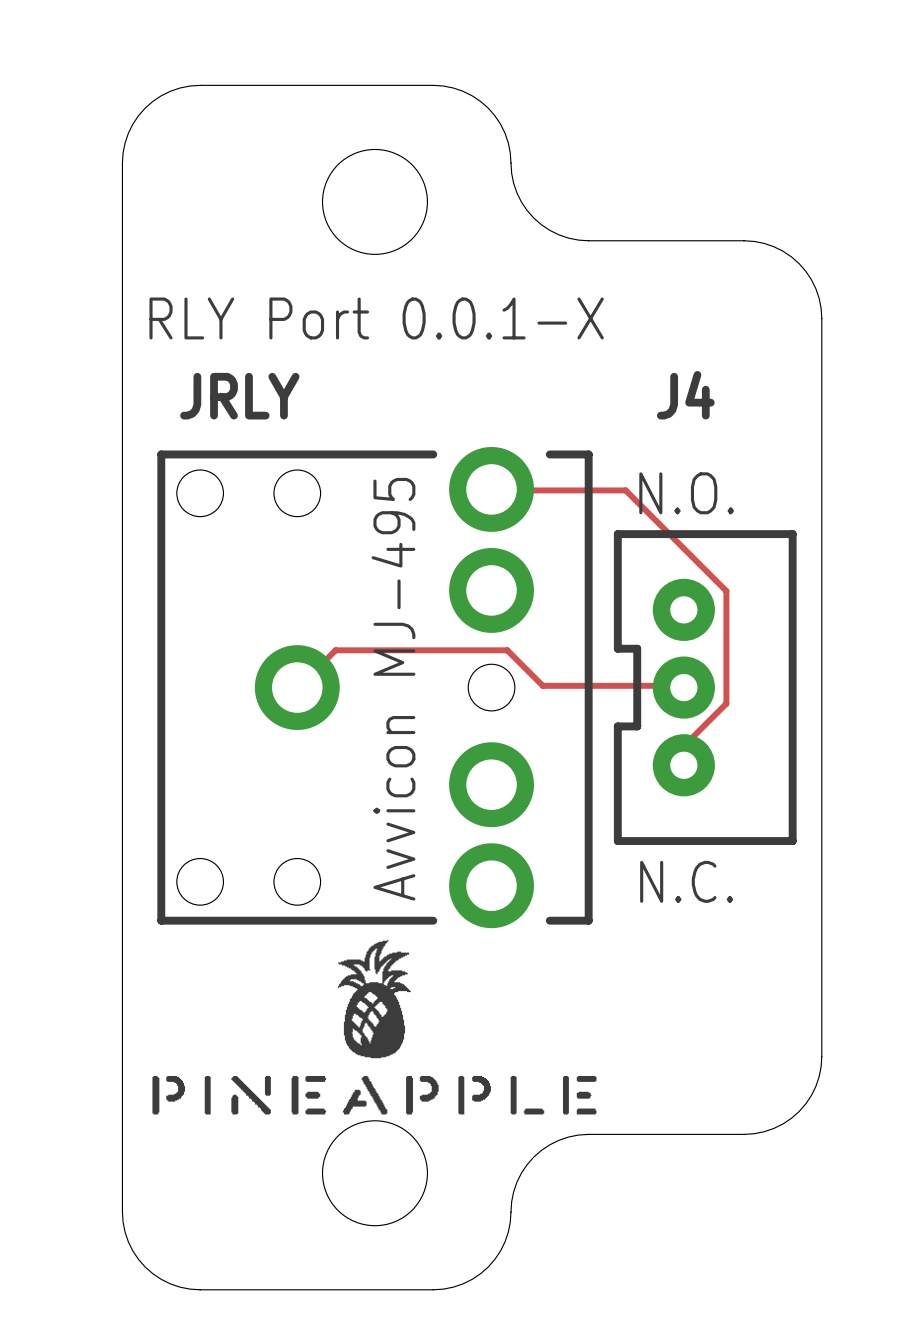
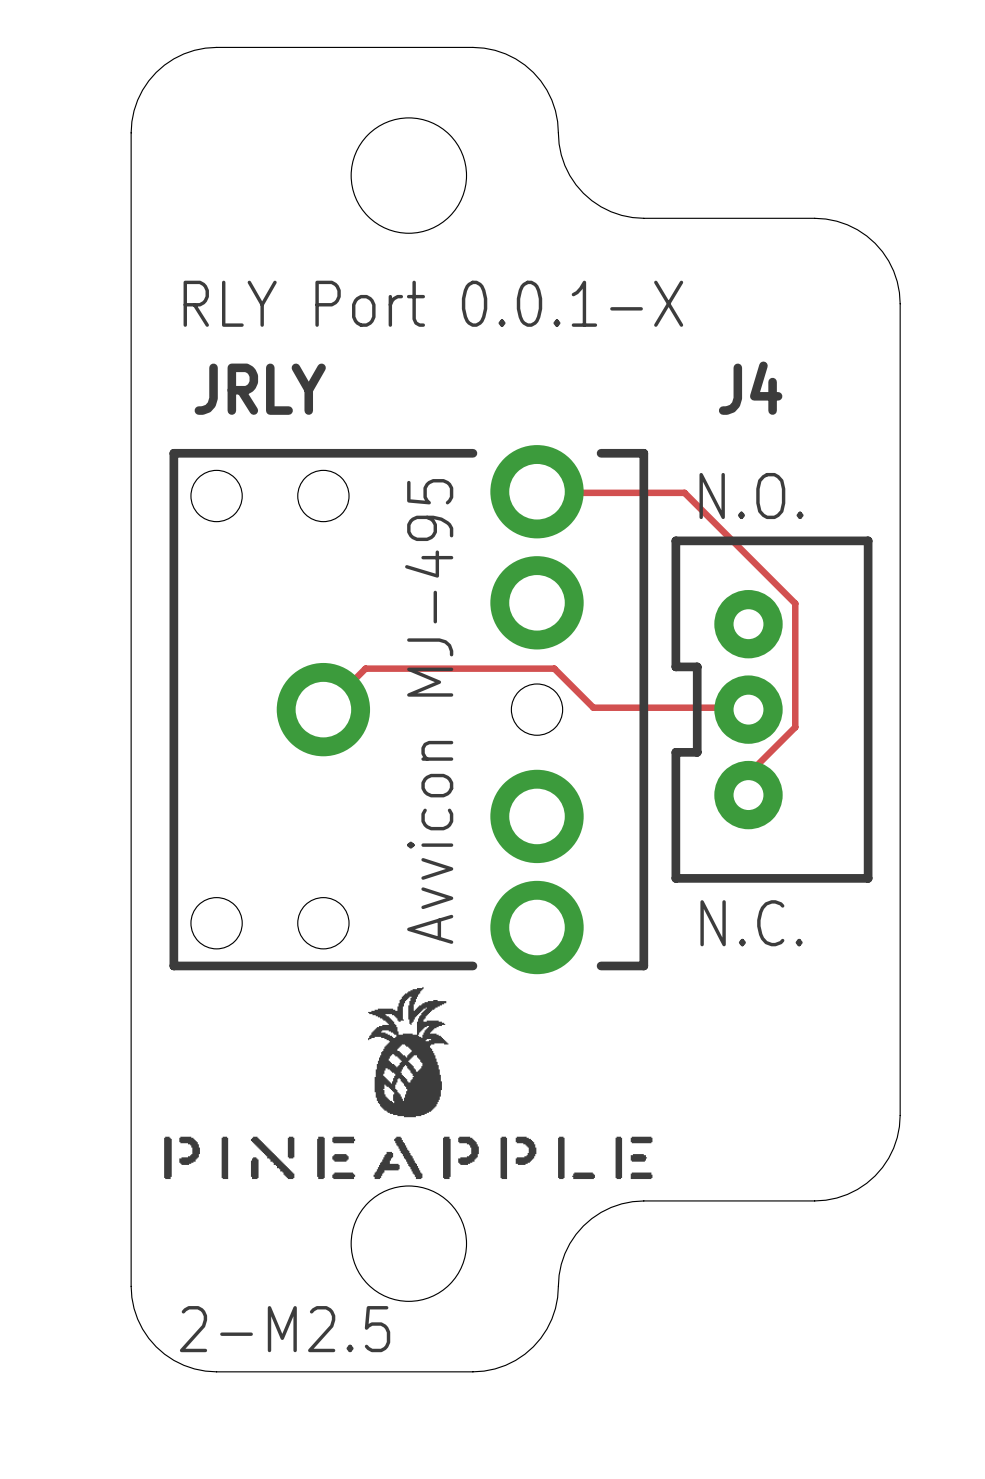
text position: RLY Port 0.0.1-X (376, 318) -> RLY Port 0.0.1-X (433, 303)
text: none -> 2-M2.5 (285, 1329)

